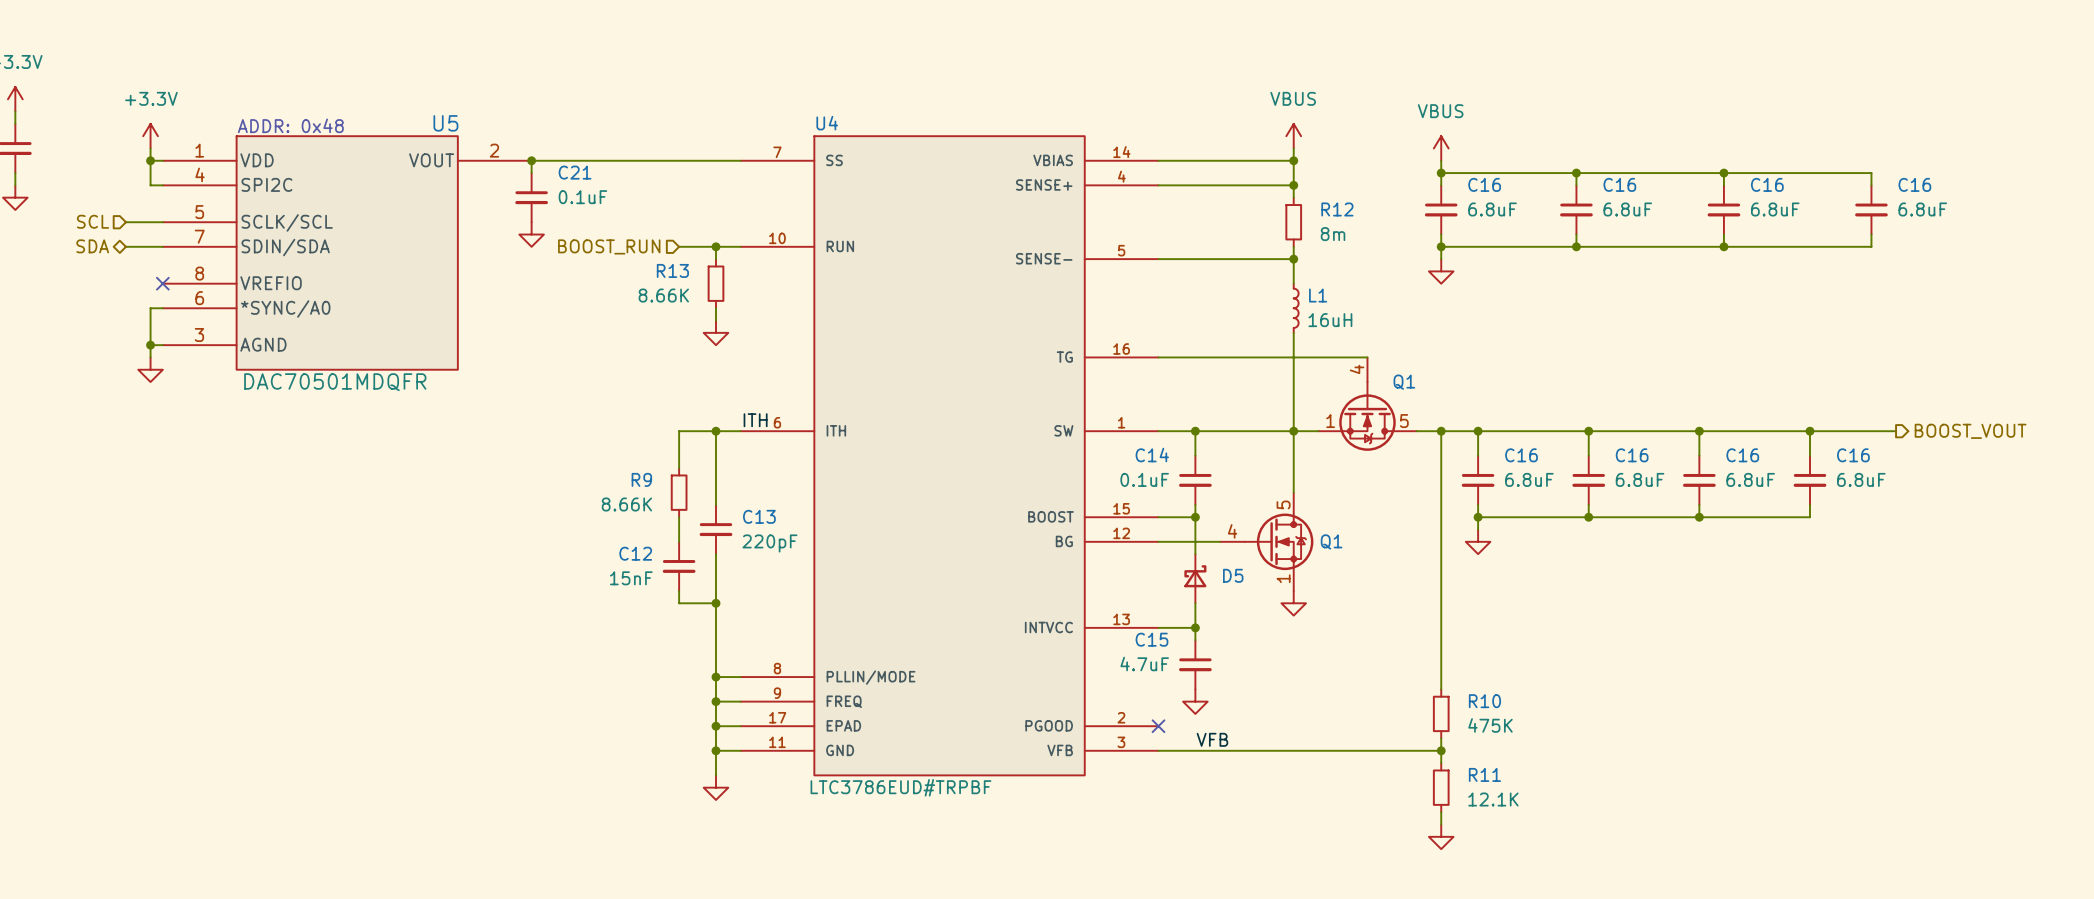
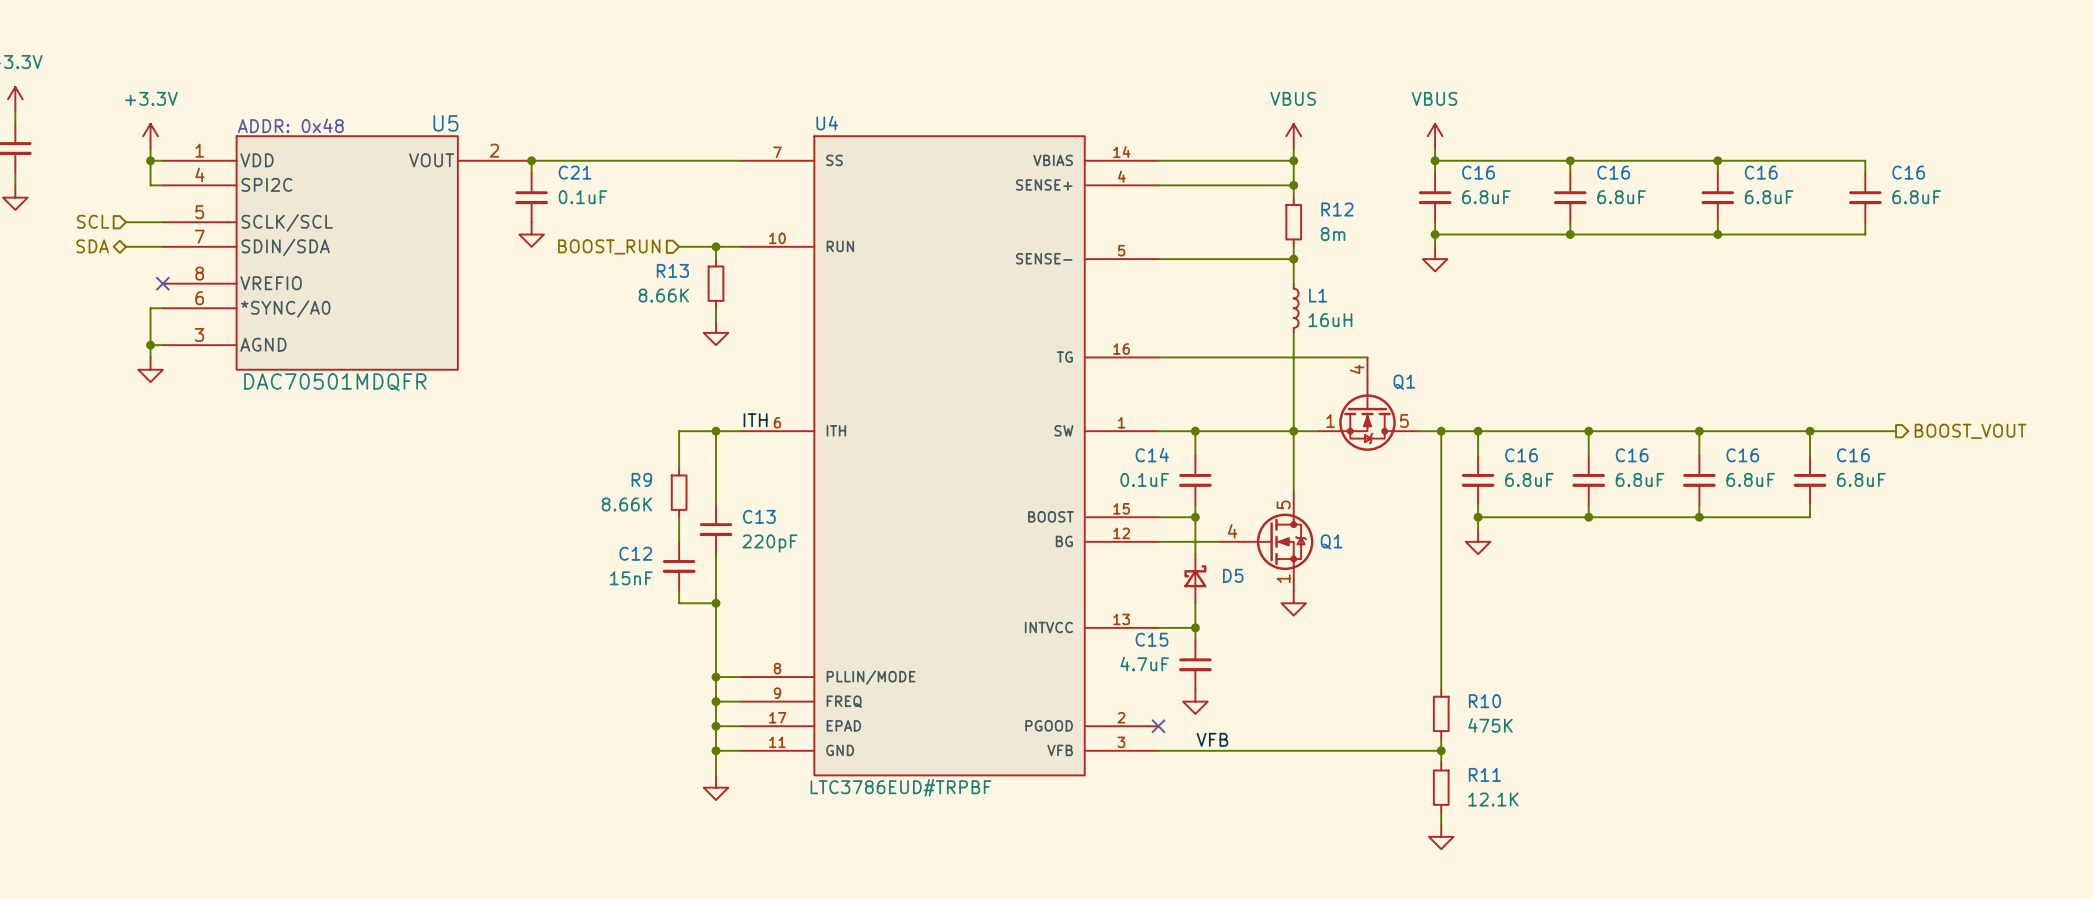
power symbol position: VBUS (1441, 148) -> VBUS (1435, 136)
wire: (1441, 160) (1441, 185) -> (1435, 148) (1435, 173)
wire: (1441, 173) (1871, 173) (1871, 185) -> (1435, 160) (1865, 160) (1865, 173)
junction position: (1441, 173) -> (1435, 160)
wire: (1576, 173) (1576, 185) -> (1570, 160) (1570, 173)
junction position: (1576, 173) -> (1570, 160)
wire: (1723, 173) (1723, 185) -> (1717, 160) (1717, 173)
junction position: (1723, 173) -> (1717, 160)
C16 position: (1441, 209) -> (1435, 197)
C16 position: (1576, 209) -> (1570, 197)
C16 position: (1723, 209) -> (1717, 197)
C16 position: (1871, 209) -> (1865, 197)
wire: (1441, 234) (1441, 259) -> (1435, 222) (1435, 246)
wire: (1576, 234) (1576, 246) -> (1570, 222) (1570, 234)
wire: (1723, 234) (1723, 246) -> (1717, 222) (1717, 234)
wire: (1871, 234) (1871, 246) (1441, 246) -> (1865, 222) (1865, 234) (1435, 234)
junction position: (1441, 246) -> (1435, 234)
junction position: (1576, 246) -> (1570, 234)
junction position: (1723, 246) -> (1717, 234)
power symbol position: (1441, 271) -> (1435, 259)

